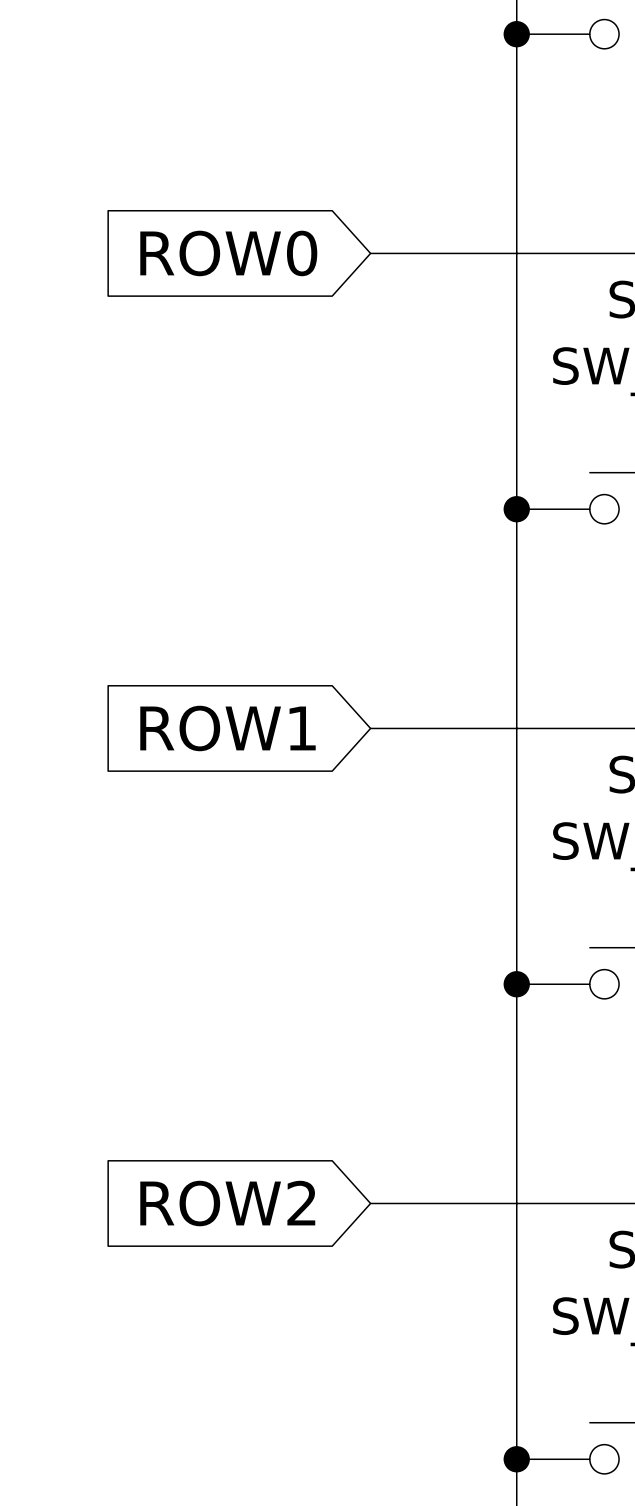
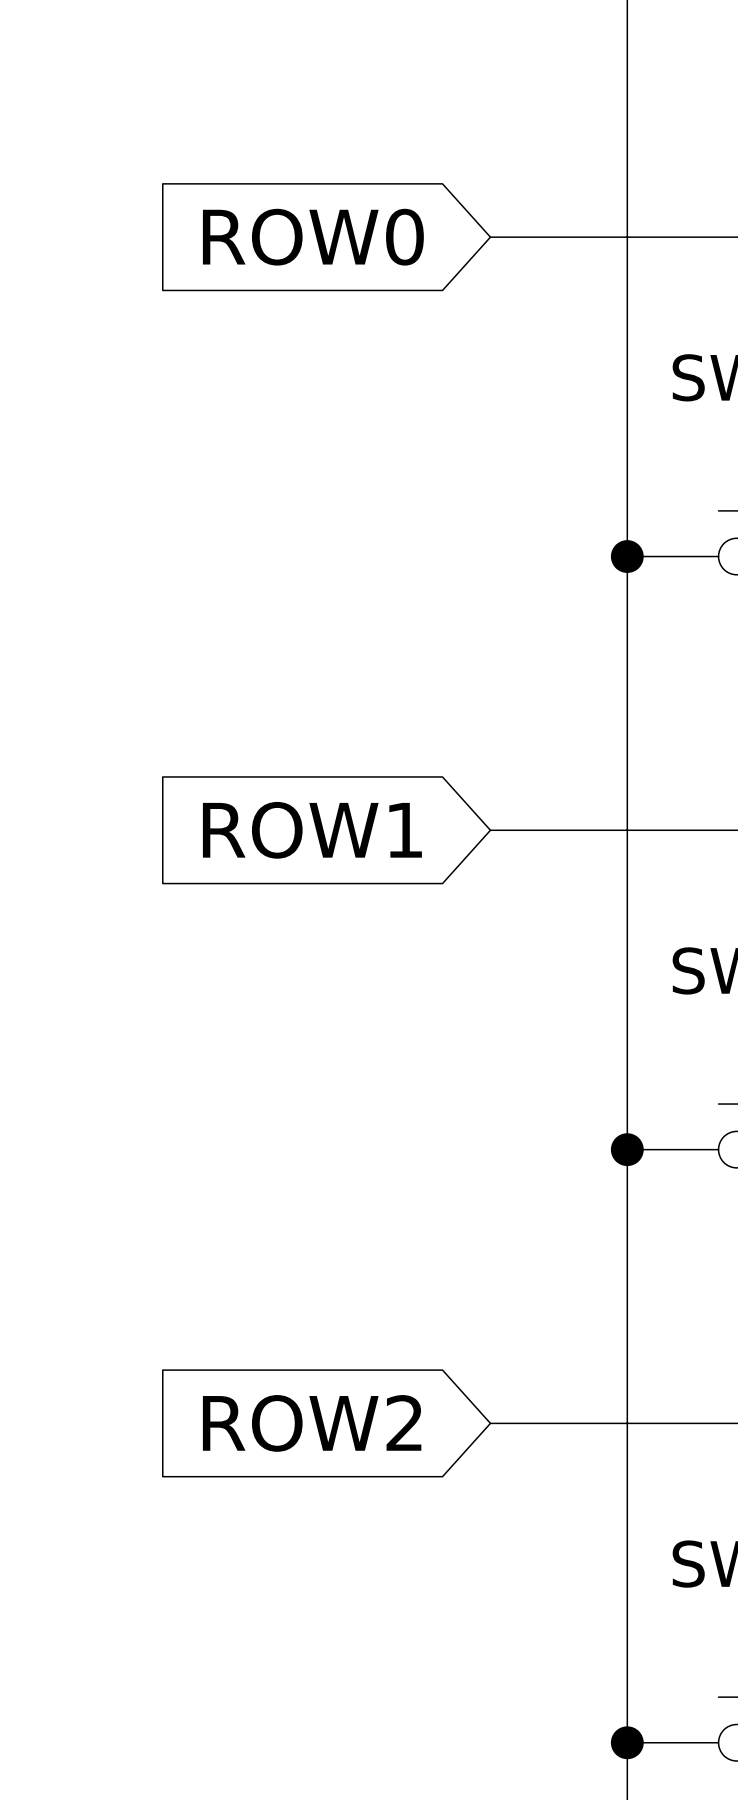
global label position: ROW0 (228, 253) -> ROW0 (313, 237)
wire: (370, 253) (407, 253) -> none
global label position: ROW1 (228, 728) -> ROW1 (312, 830)
wire: (370, 728) (407, 728) -> none
global label position: ROW2 (227, 1203) -> ROW2 (312, 1423)
wire: (370, 1203) (407, 1203) -> none

